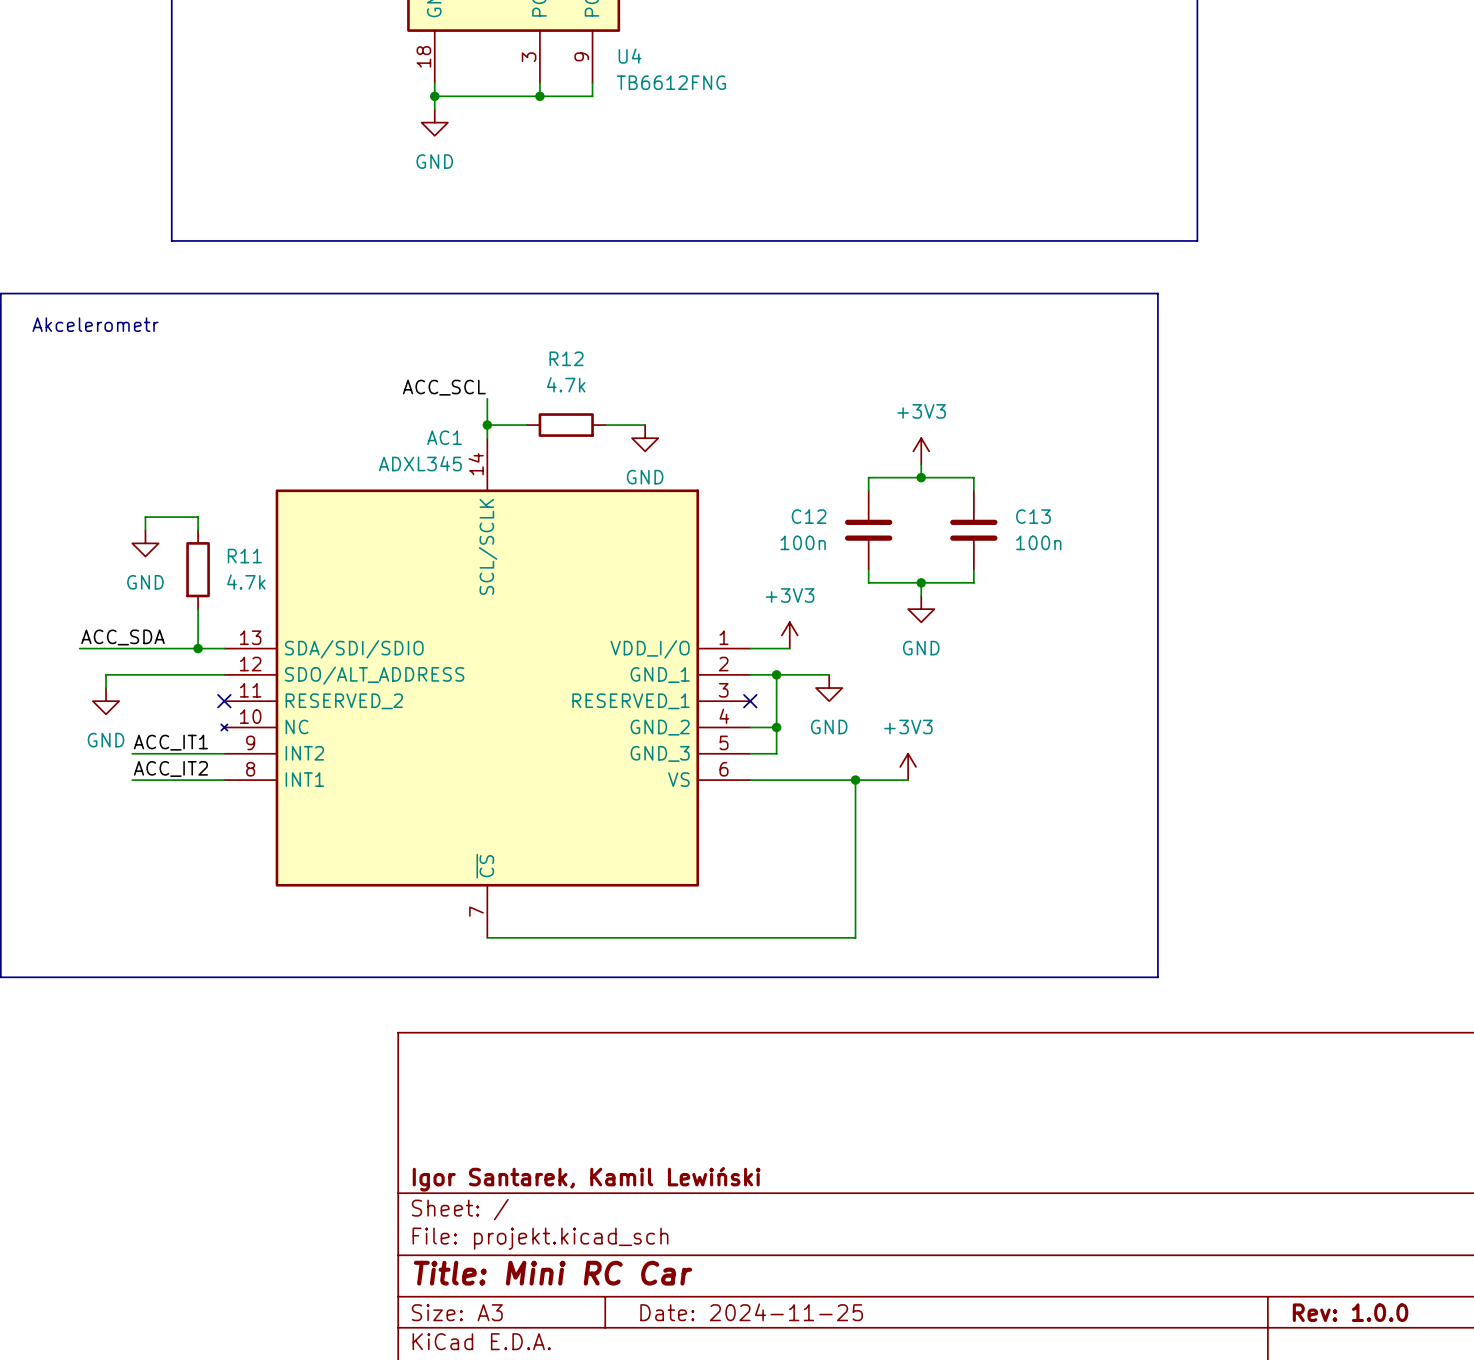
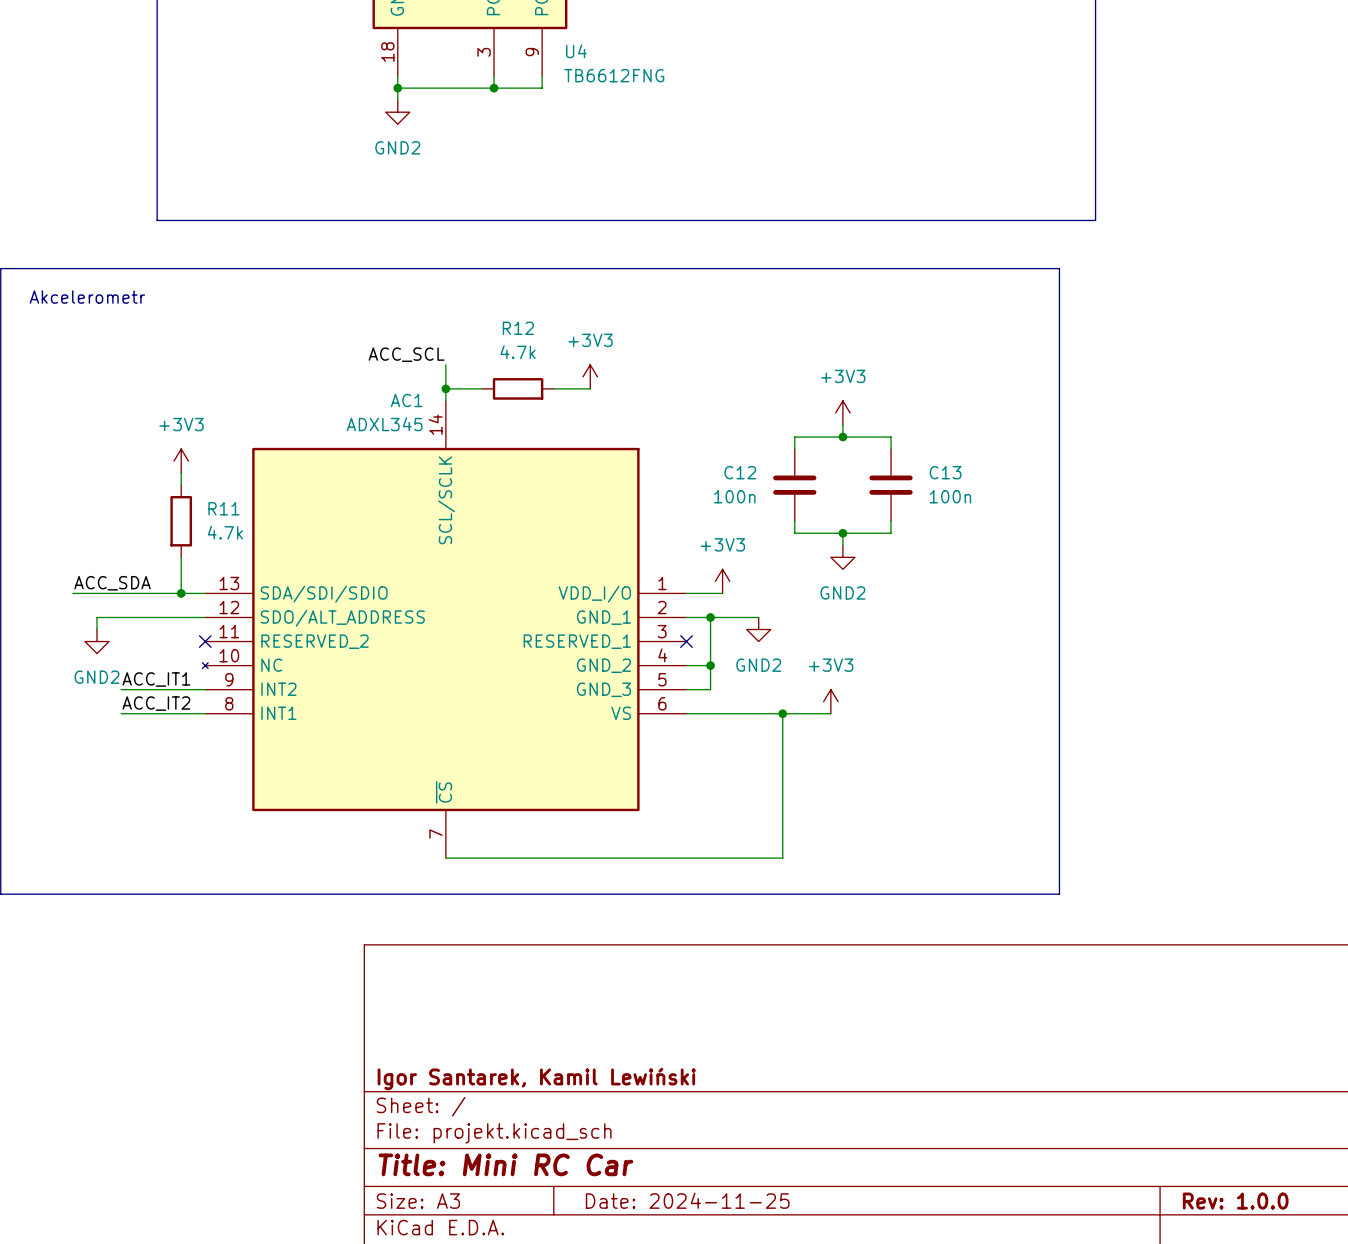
power symbol: GND (434, 122) -> GND2 (397, 112)
power symbol: none -> +3V3 (590, 376)
power symbol: GND (645, 438) -> none
power symbol: none -> +3V3 (181, 461)
wire: (198, 517) (145, 517) (145, 530) -> none
power symbol: GND (145, 543) -> none
power symbol: GND (921, 609) -> GND2 (842, 557)
power symbol: GND (829, 688) -> GND2 (758, 629)
power symbol: GND (106, 701) -> GND2 (97, 641)

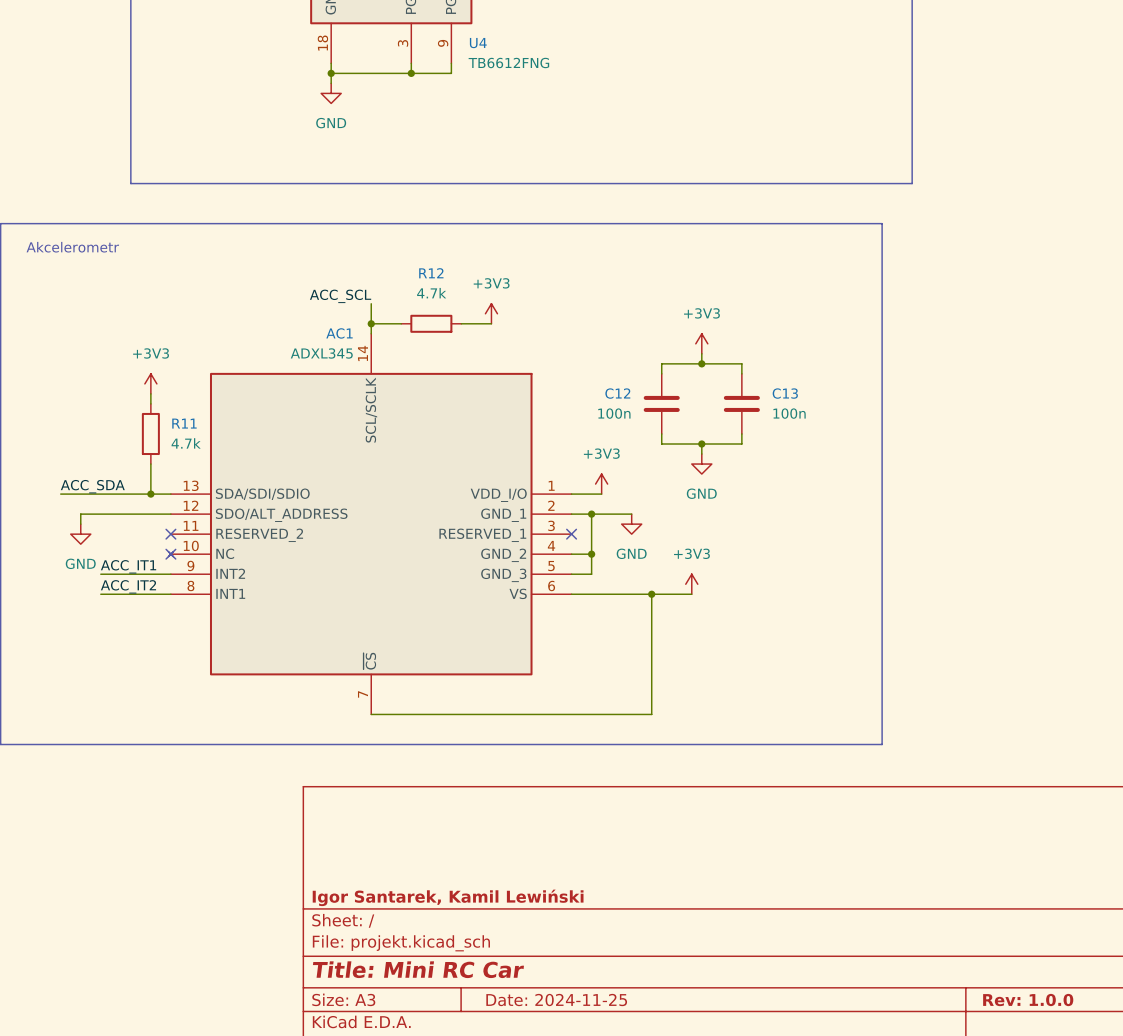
power symbol: GND2 (397, 112) -> GND (331, 93)
power symbol: GND2 (842, 557) -> GND (701, 464)
power symbol: GND2 (758, 629) -> GND (631, 524)
power symbol: GND2 (97, 641) -> GND (80, 534)
no-connect mark: none -> (170, 554)

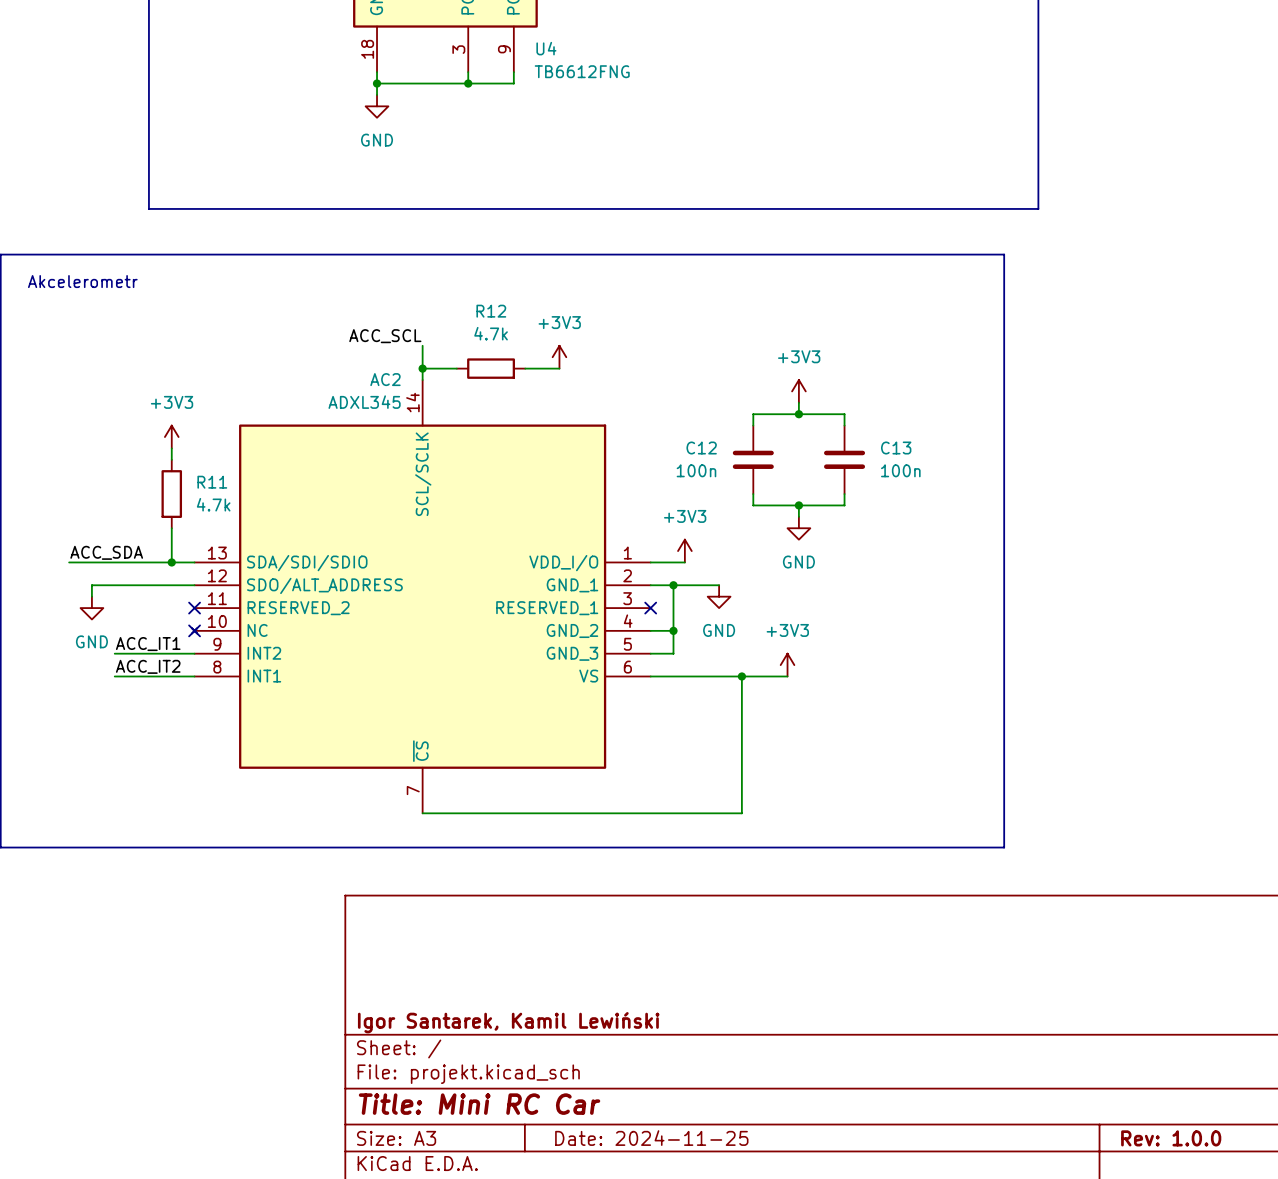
AC1 name: AC1 (339, 333) -> AC2 (385, 379)

